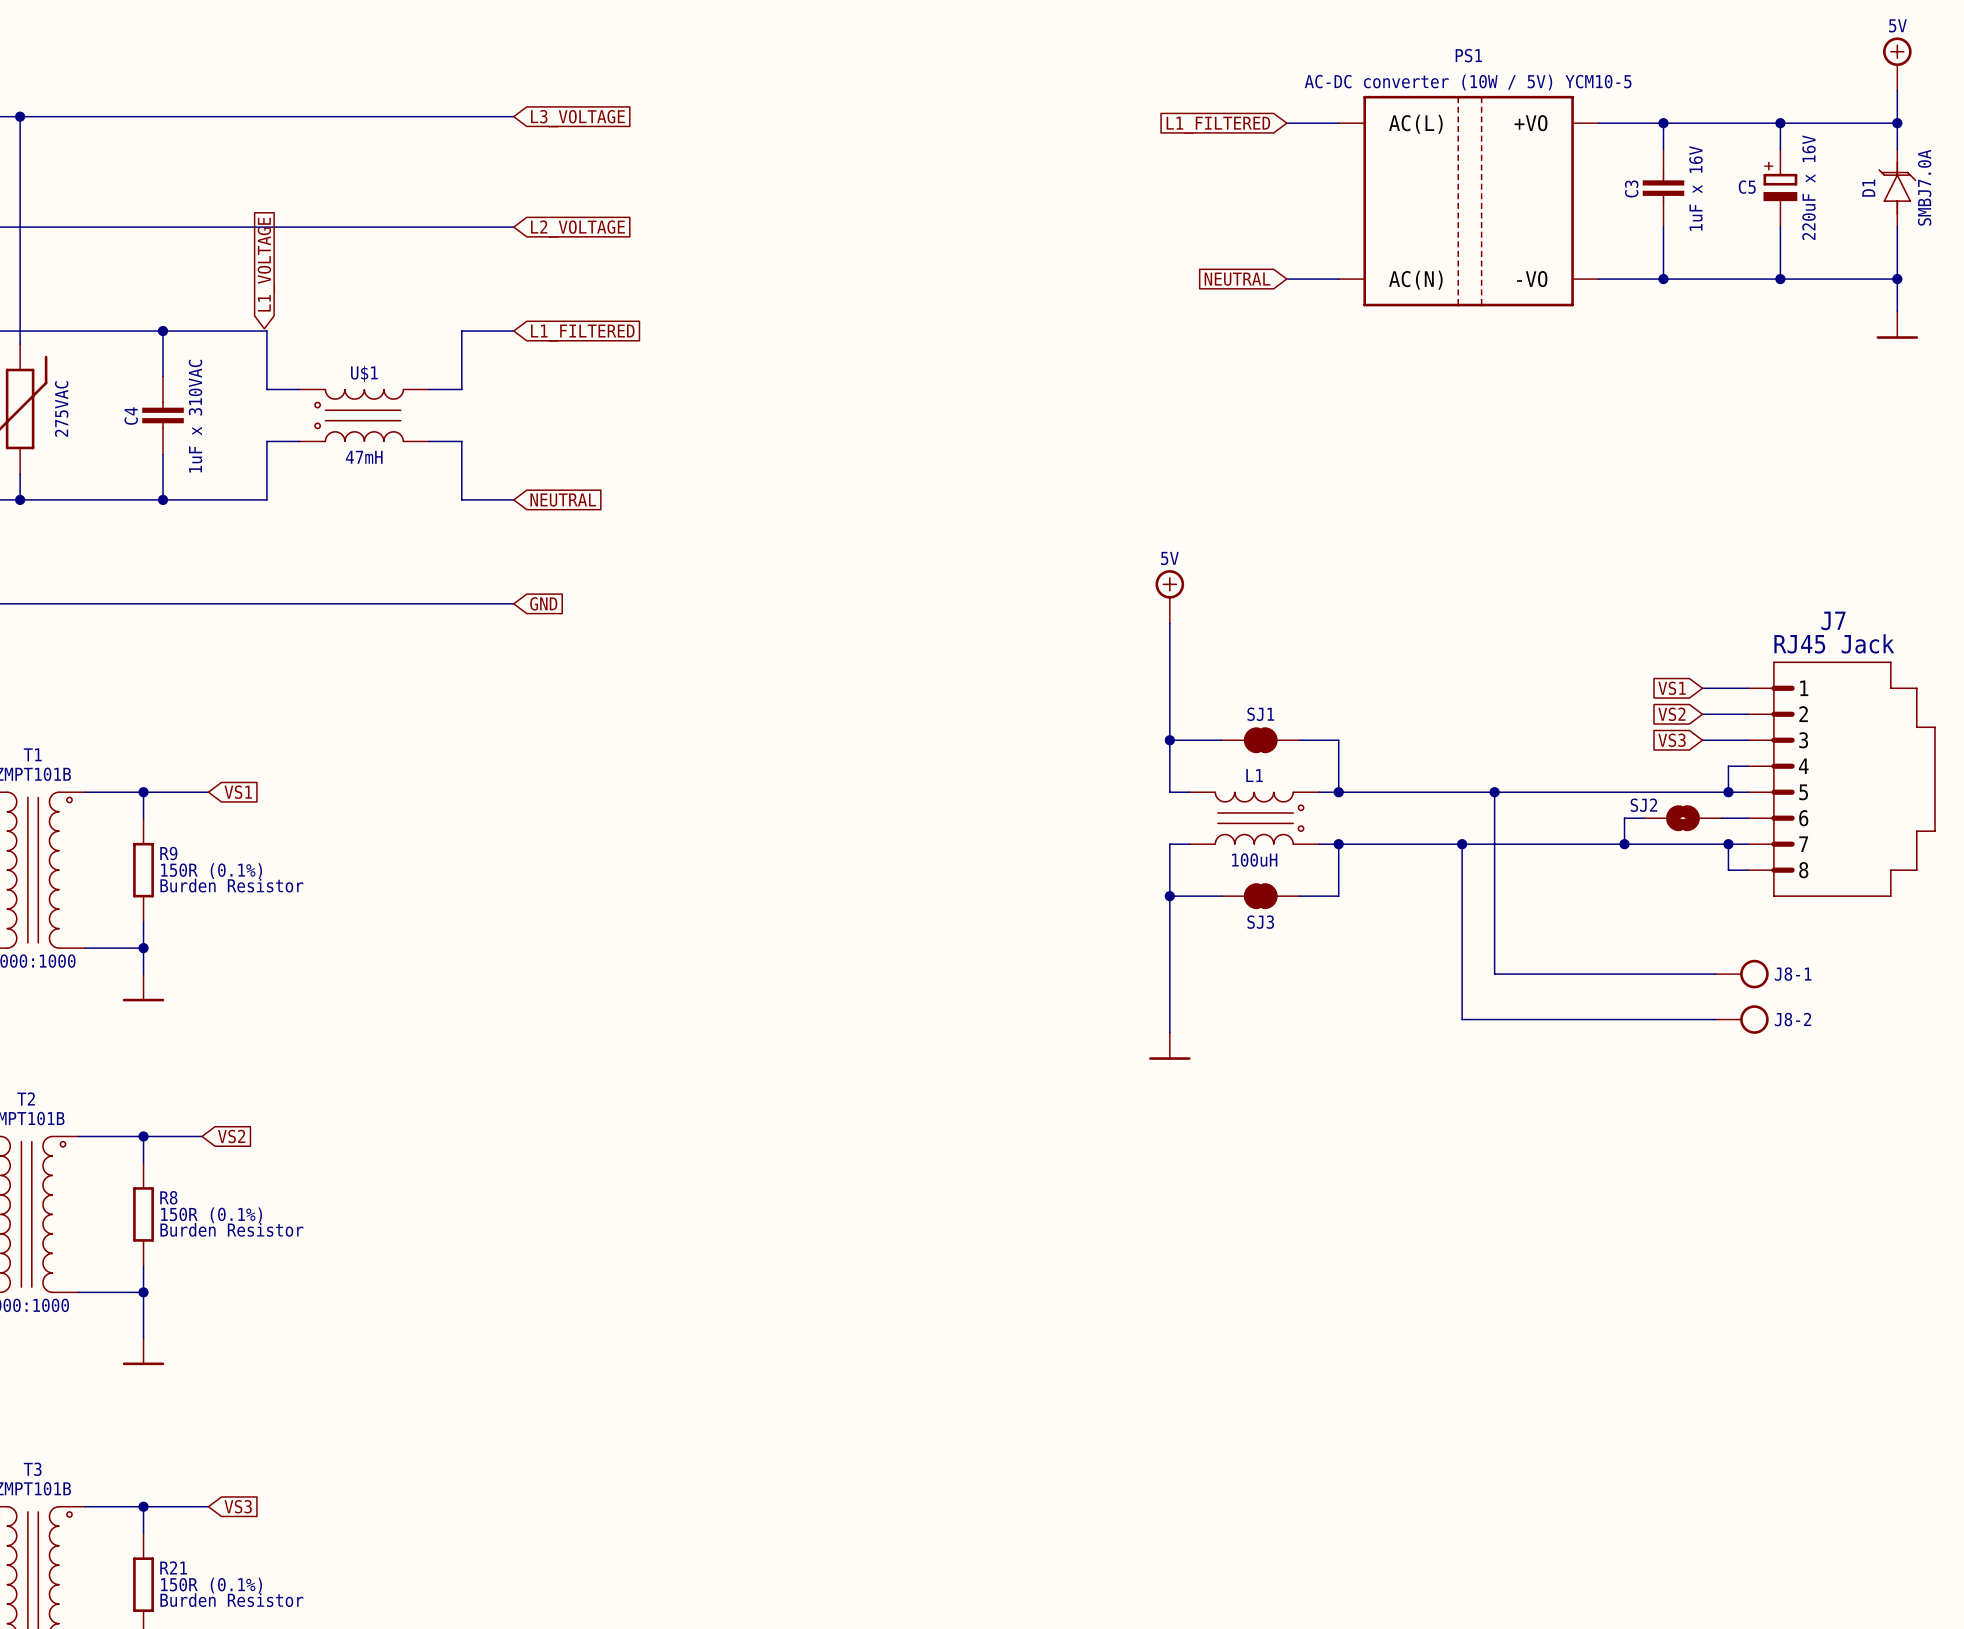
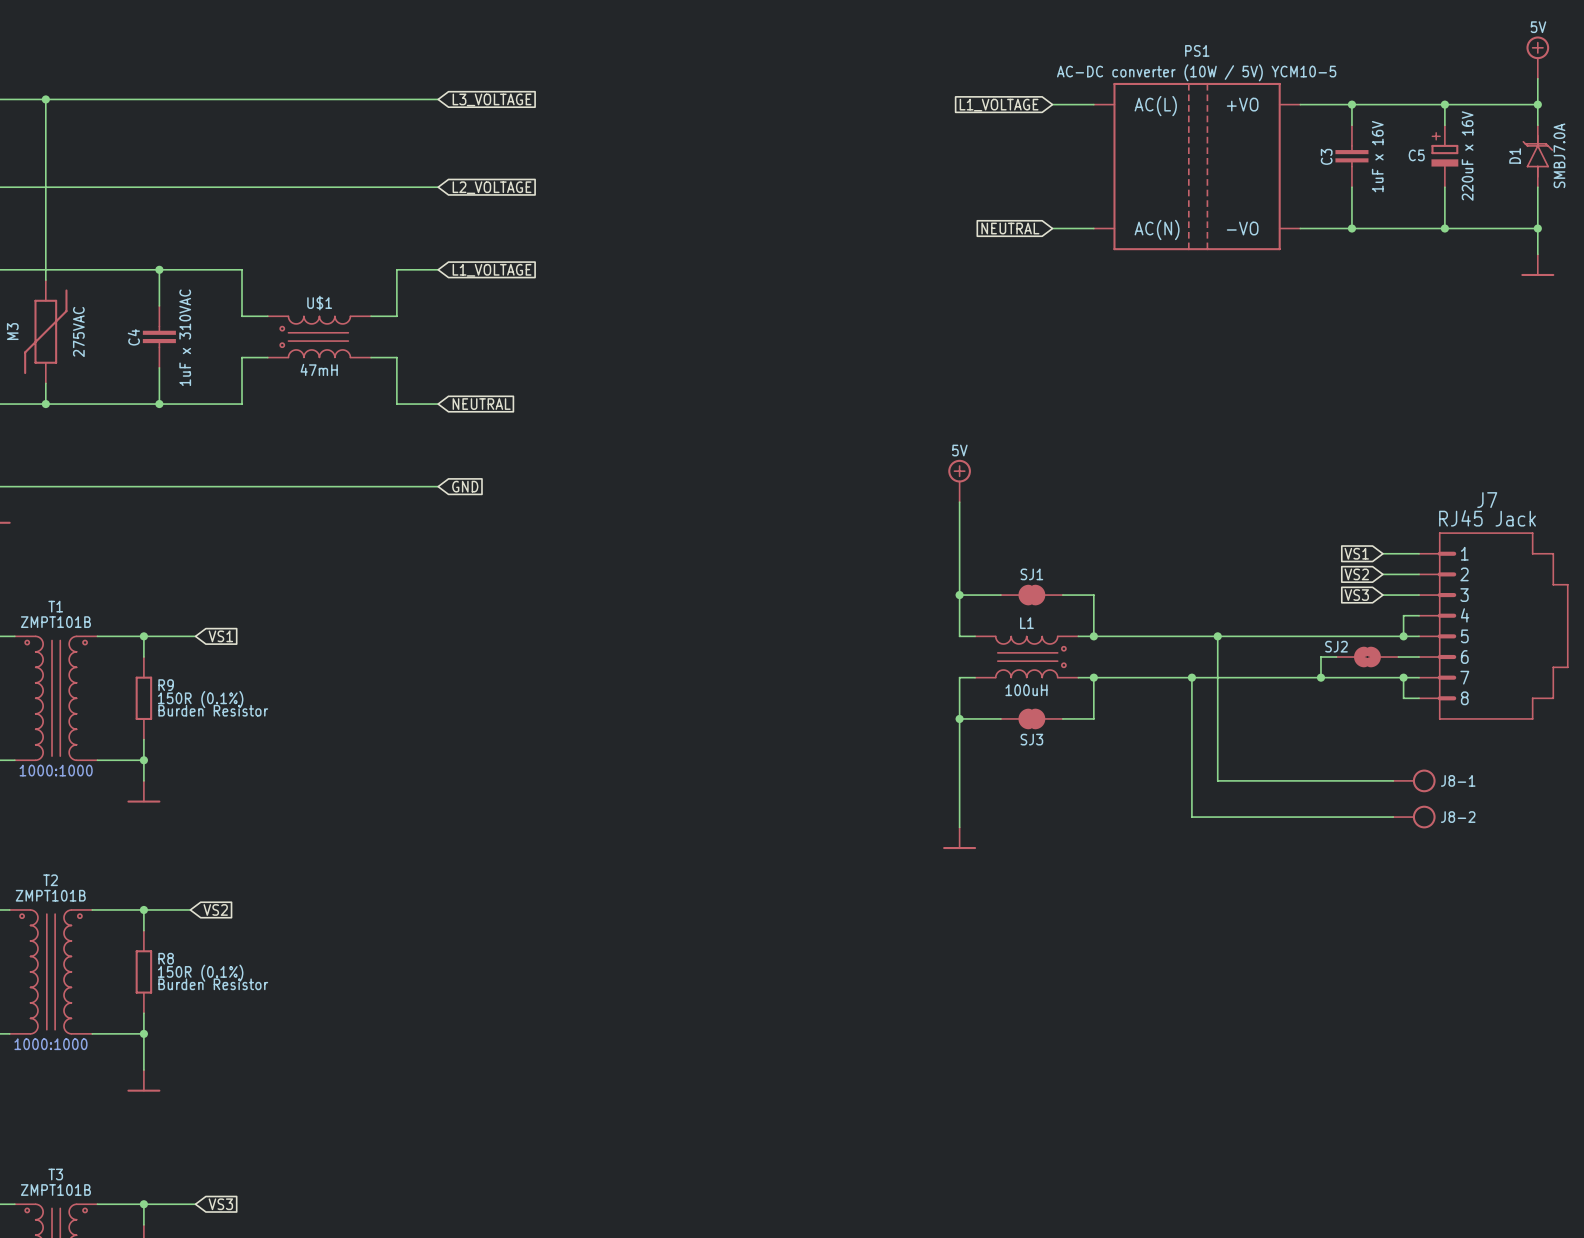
global label: L1_FILTERED (1218, 125) -> L1_VOLTAGE (999, 105)
global label: L1_VOLTAGE (266, 264) -> none
global label: L1_FILTERED (582, 333) -> L1_VOLTAGE (492, 270)

